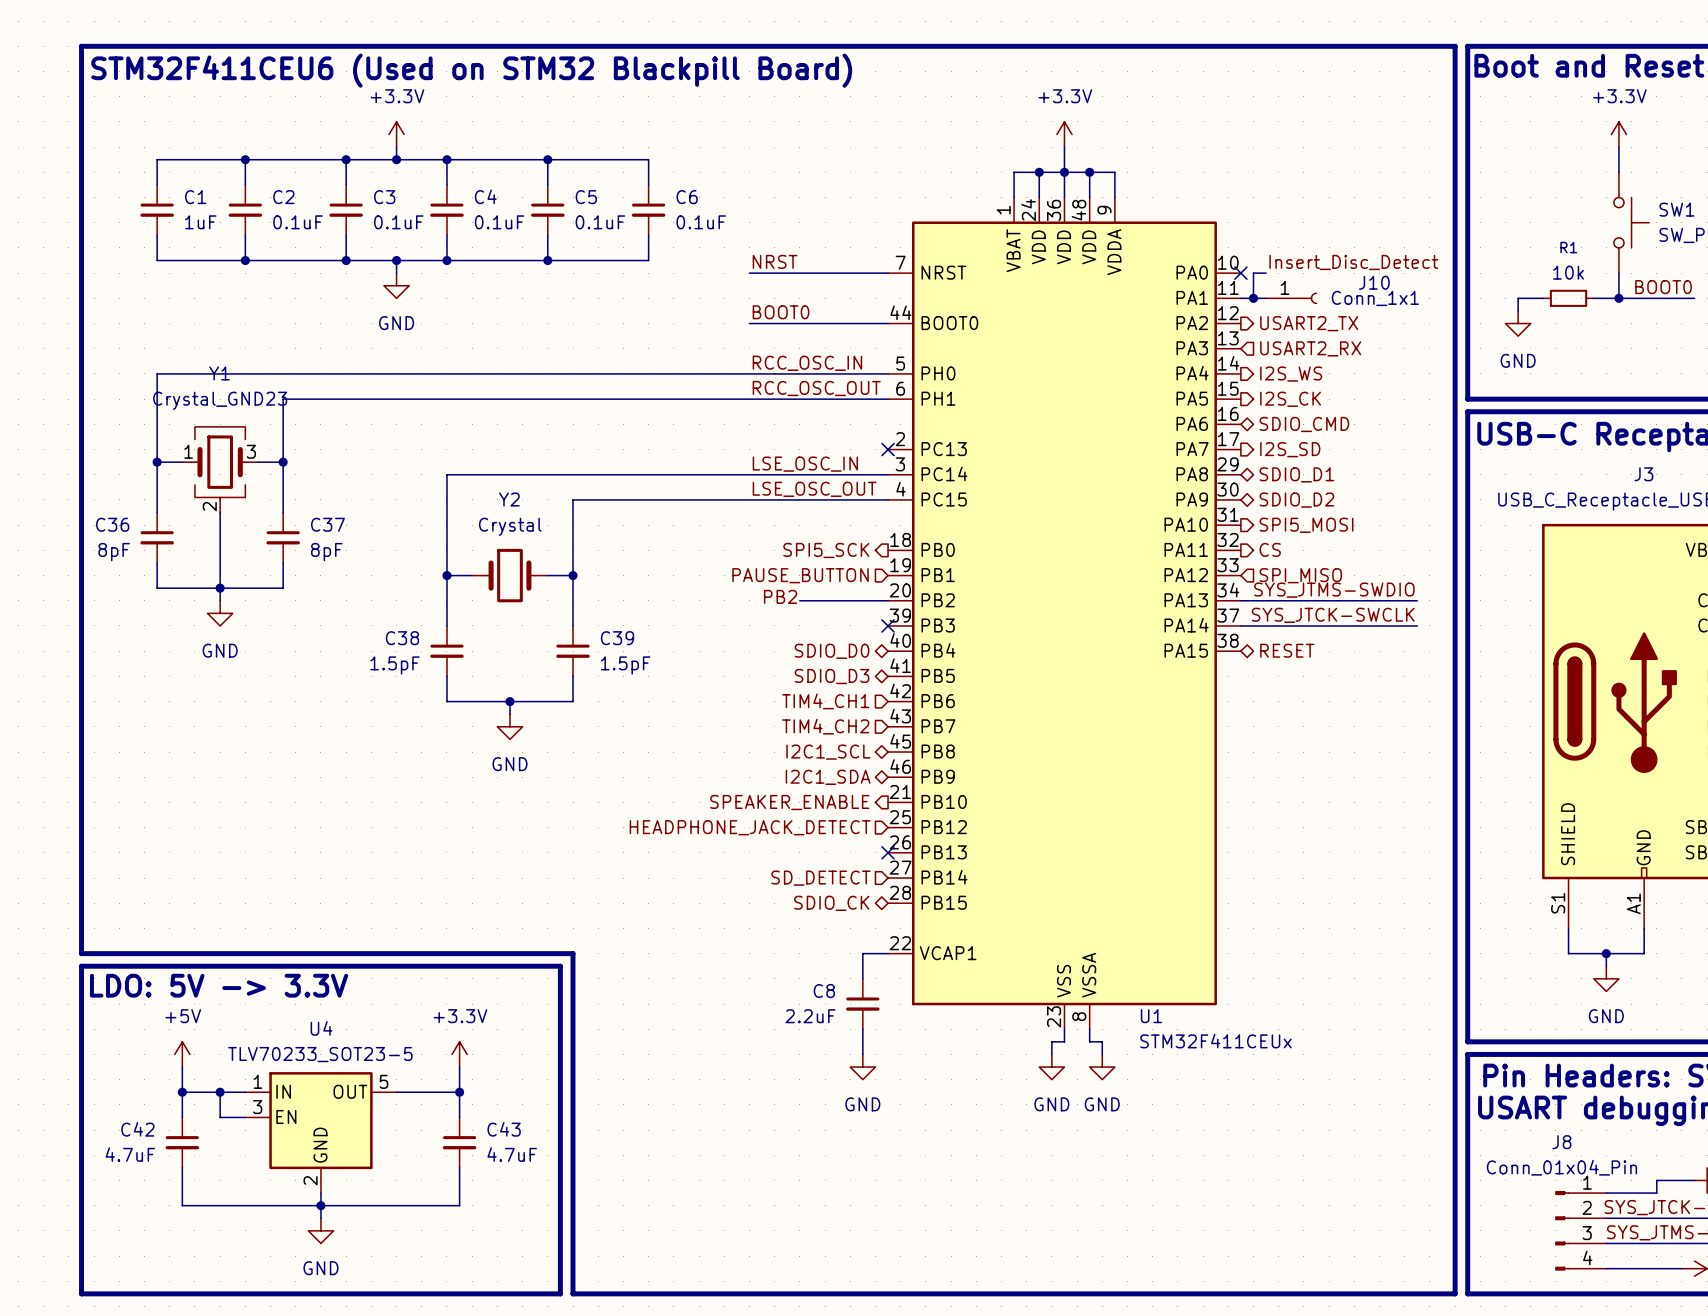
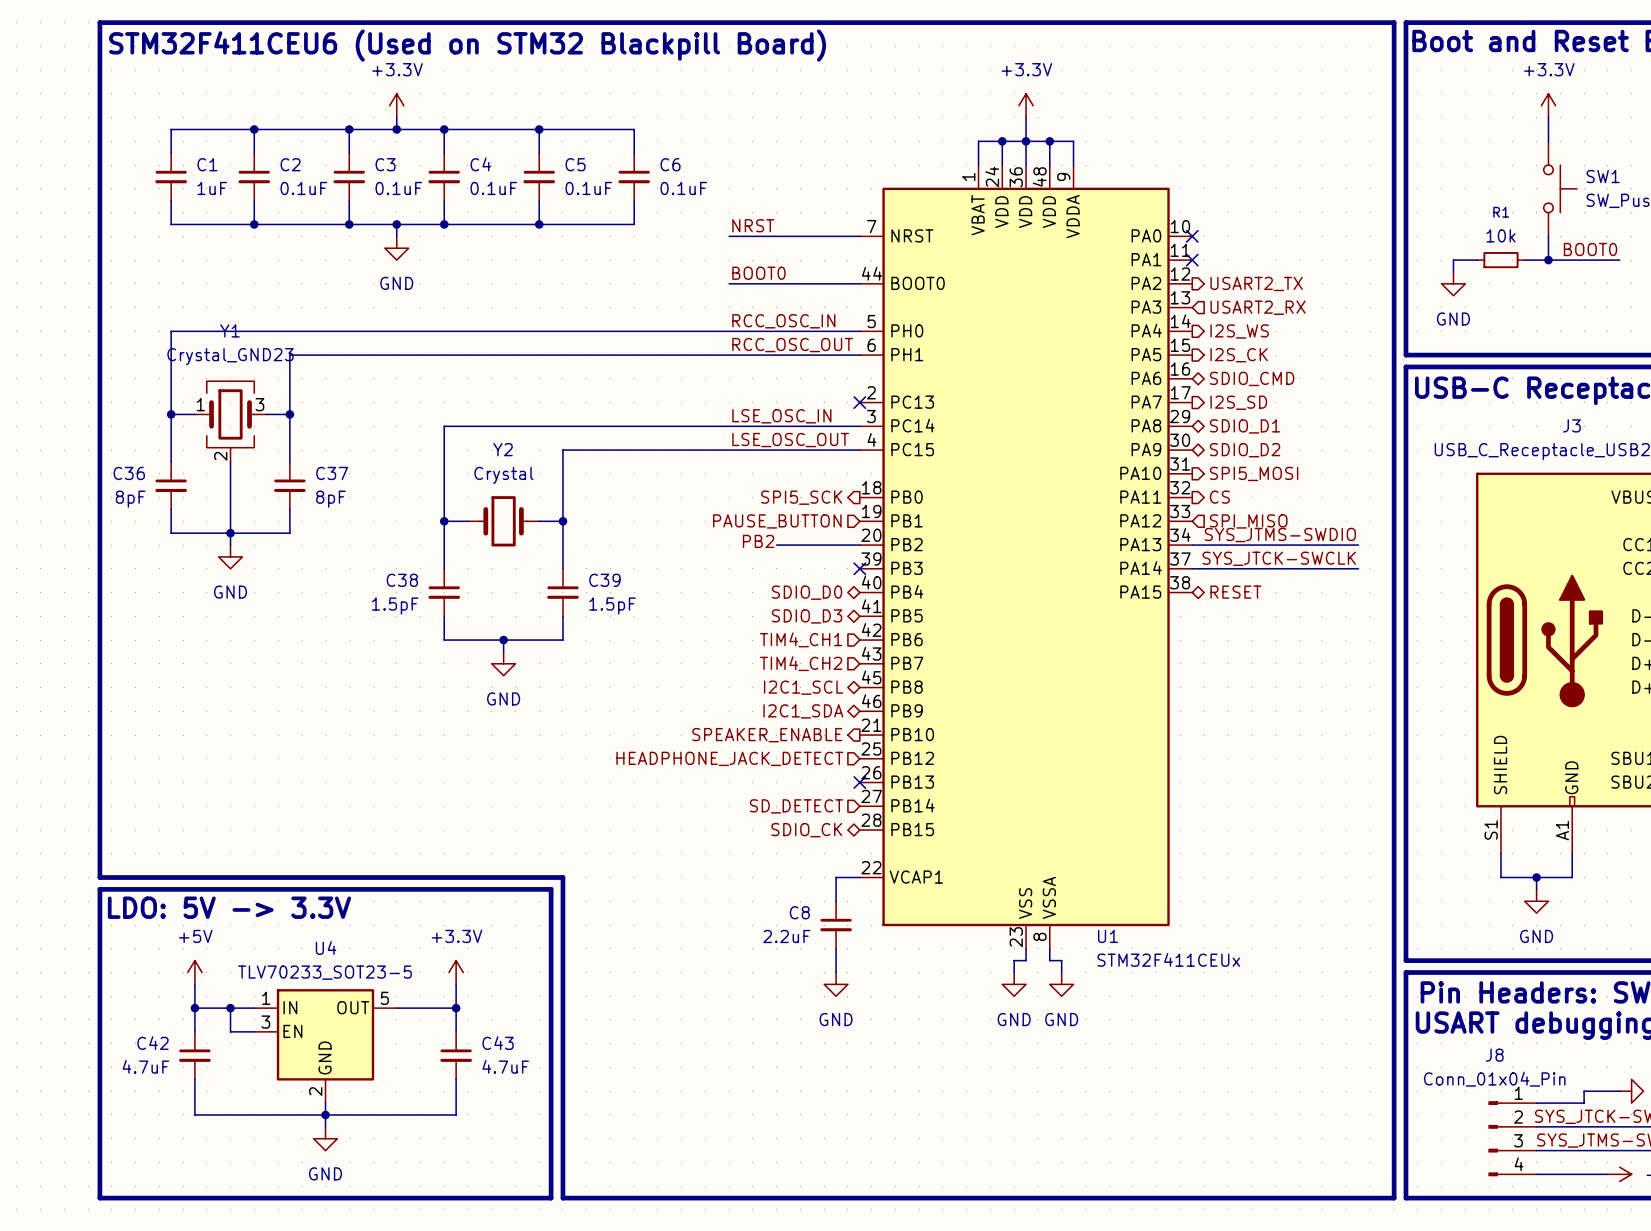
label: Insert_Disc_Detect (1353, 262) -> none
wire: (1266, 273) (1253, 273) (1253, 298) -> none
wire: (1240, 298) (1266, 298) -> none
no-connect mark: none -> (1192, 260)
junction: (1253, 298) -> none
J10: Conn_1x1 (1291, 298) -> none

